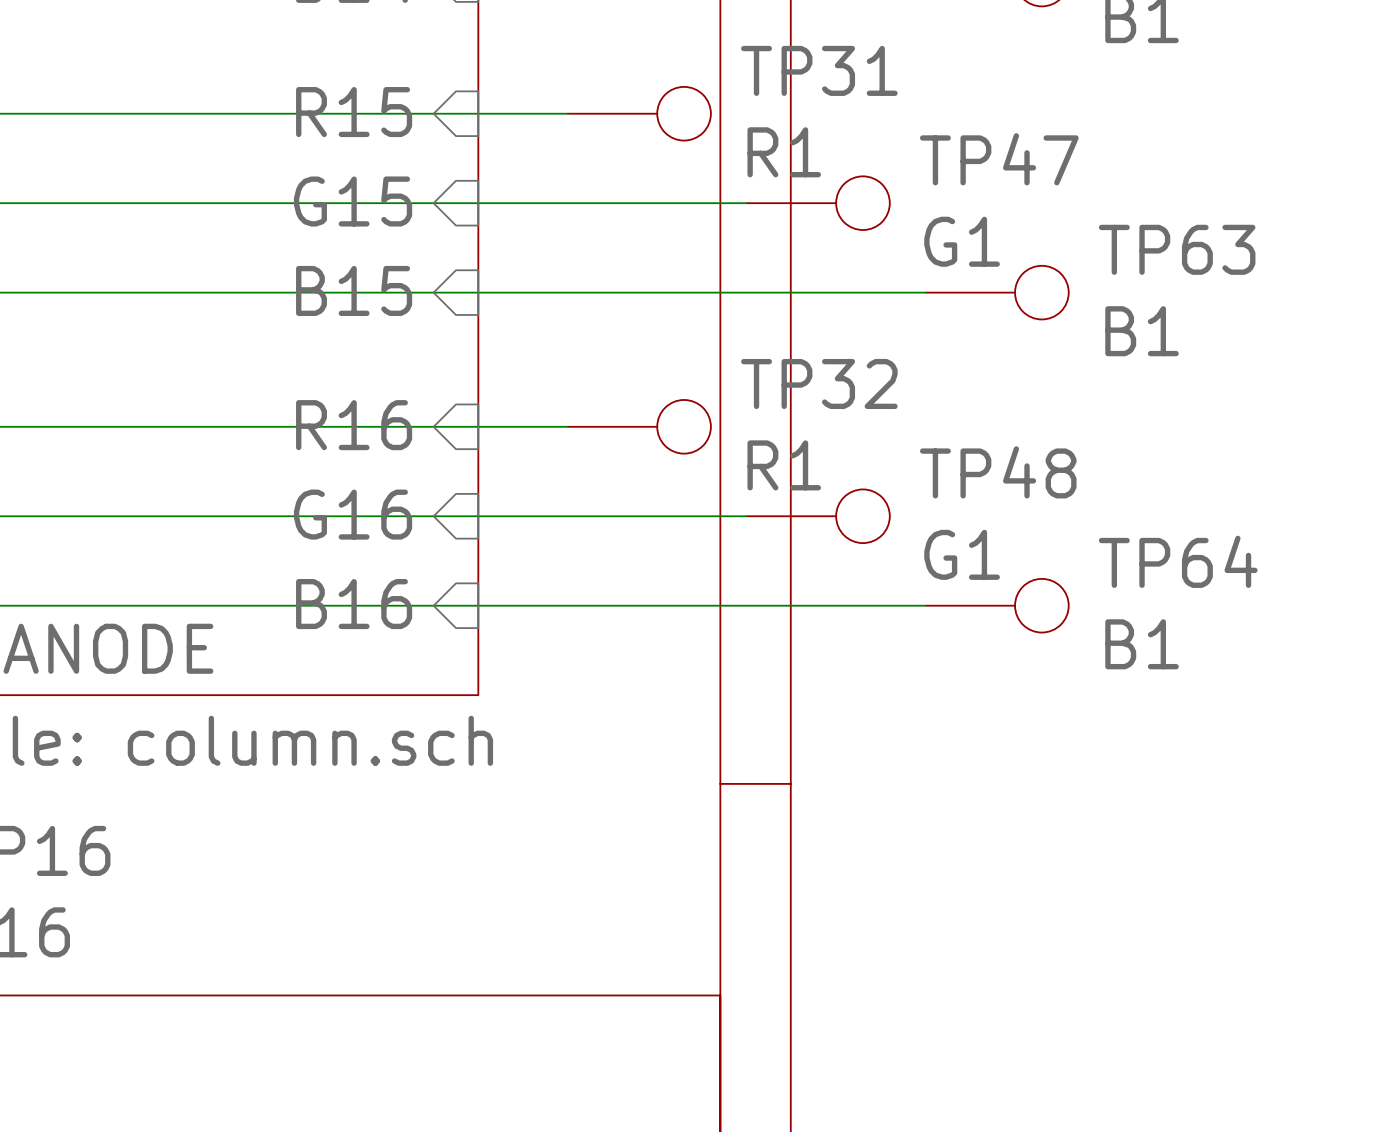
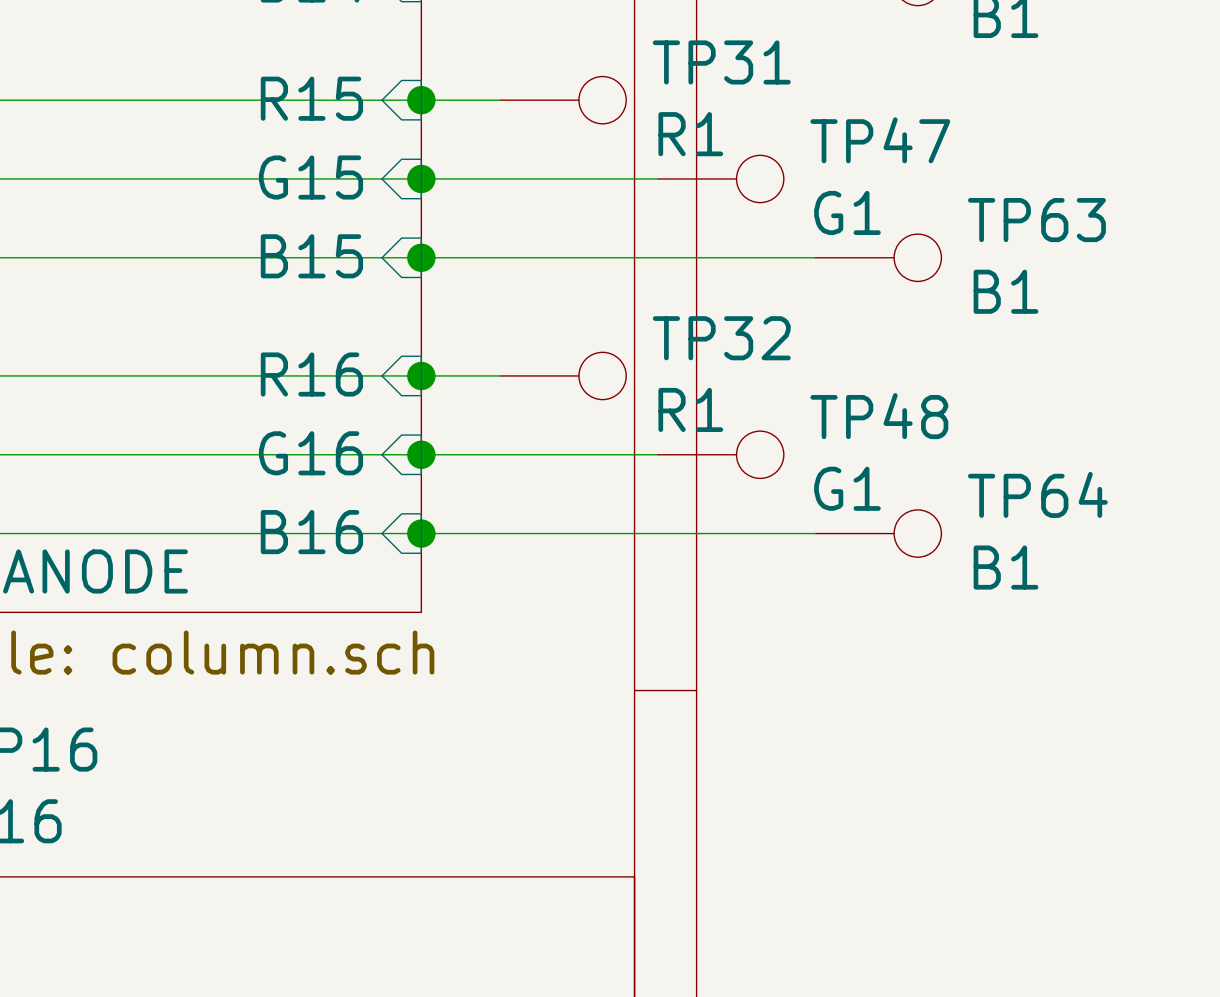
junction: none -> (421, 100)
junction: none -> (421, 178)
junction: none -> (421, 257)
junction: none -> (421, 375)
junction: none -> (421, 454)
junction: none -> (421, 533)

